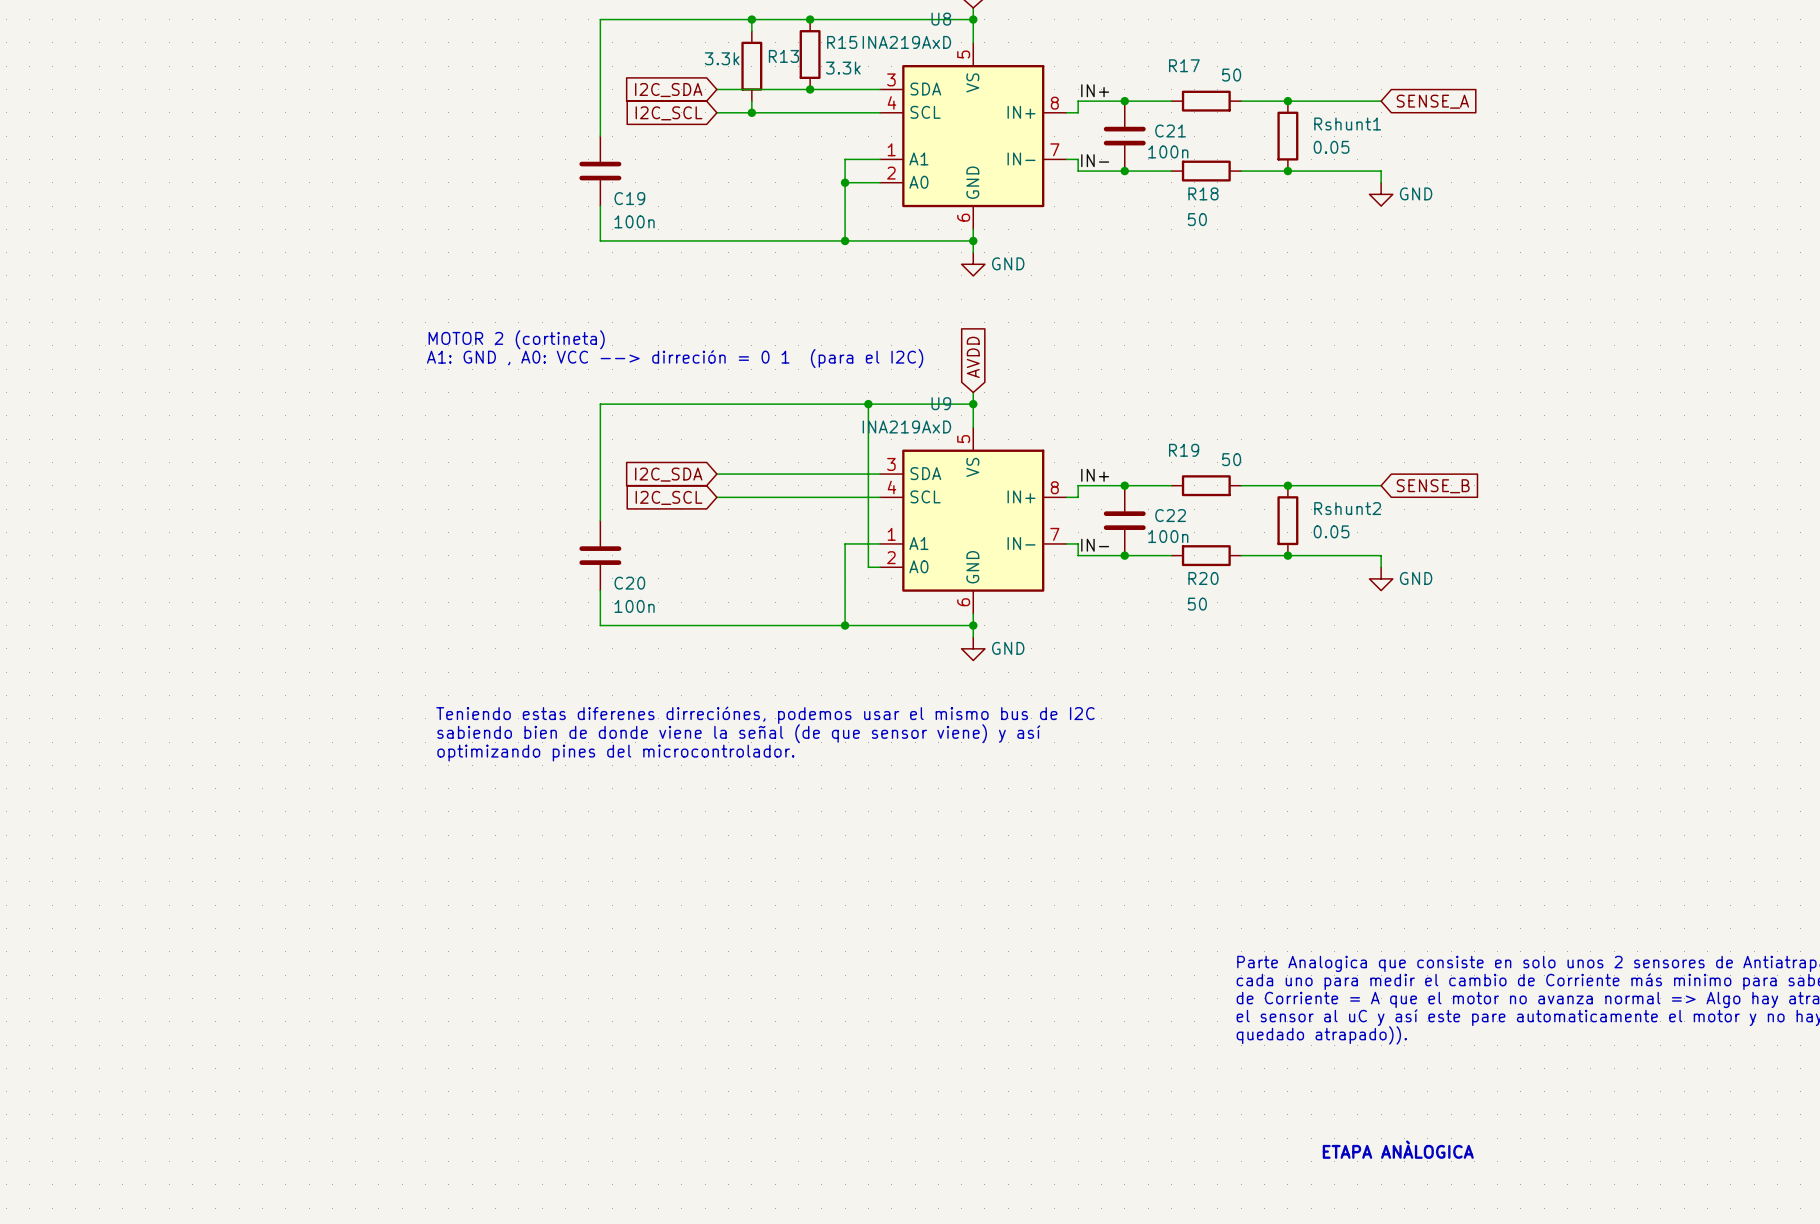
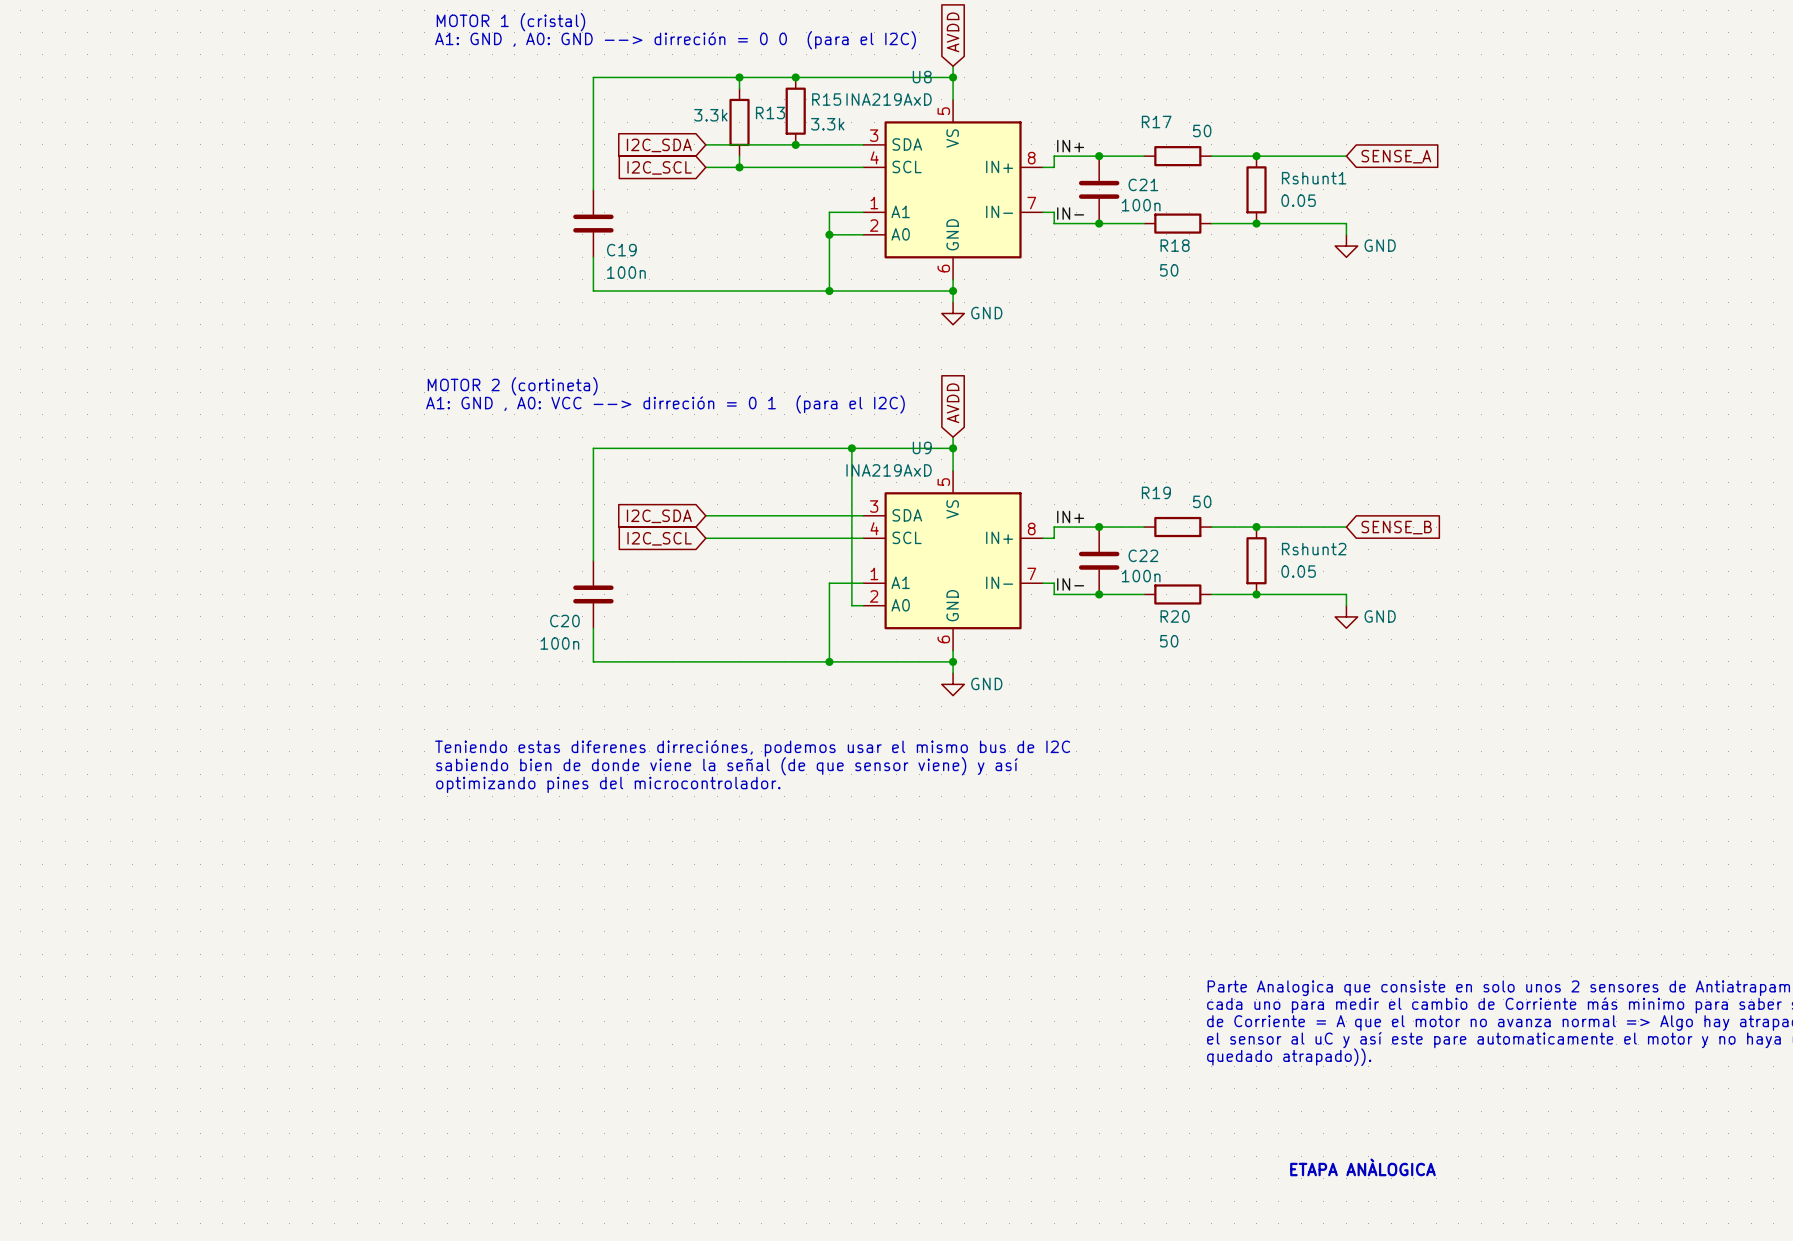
C20 name position: C20 (629, 583) -> C20 (564, 621)
C20 value position: 100n (634, 606) -> 100n (559, 643)

